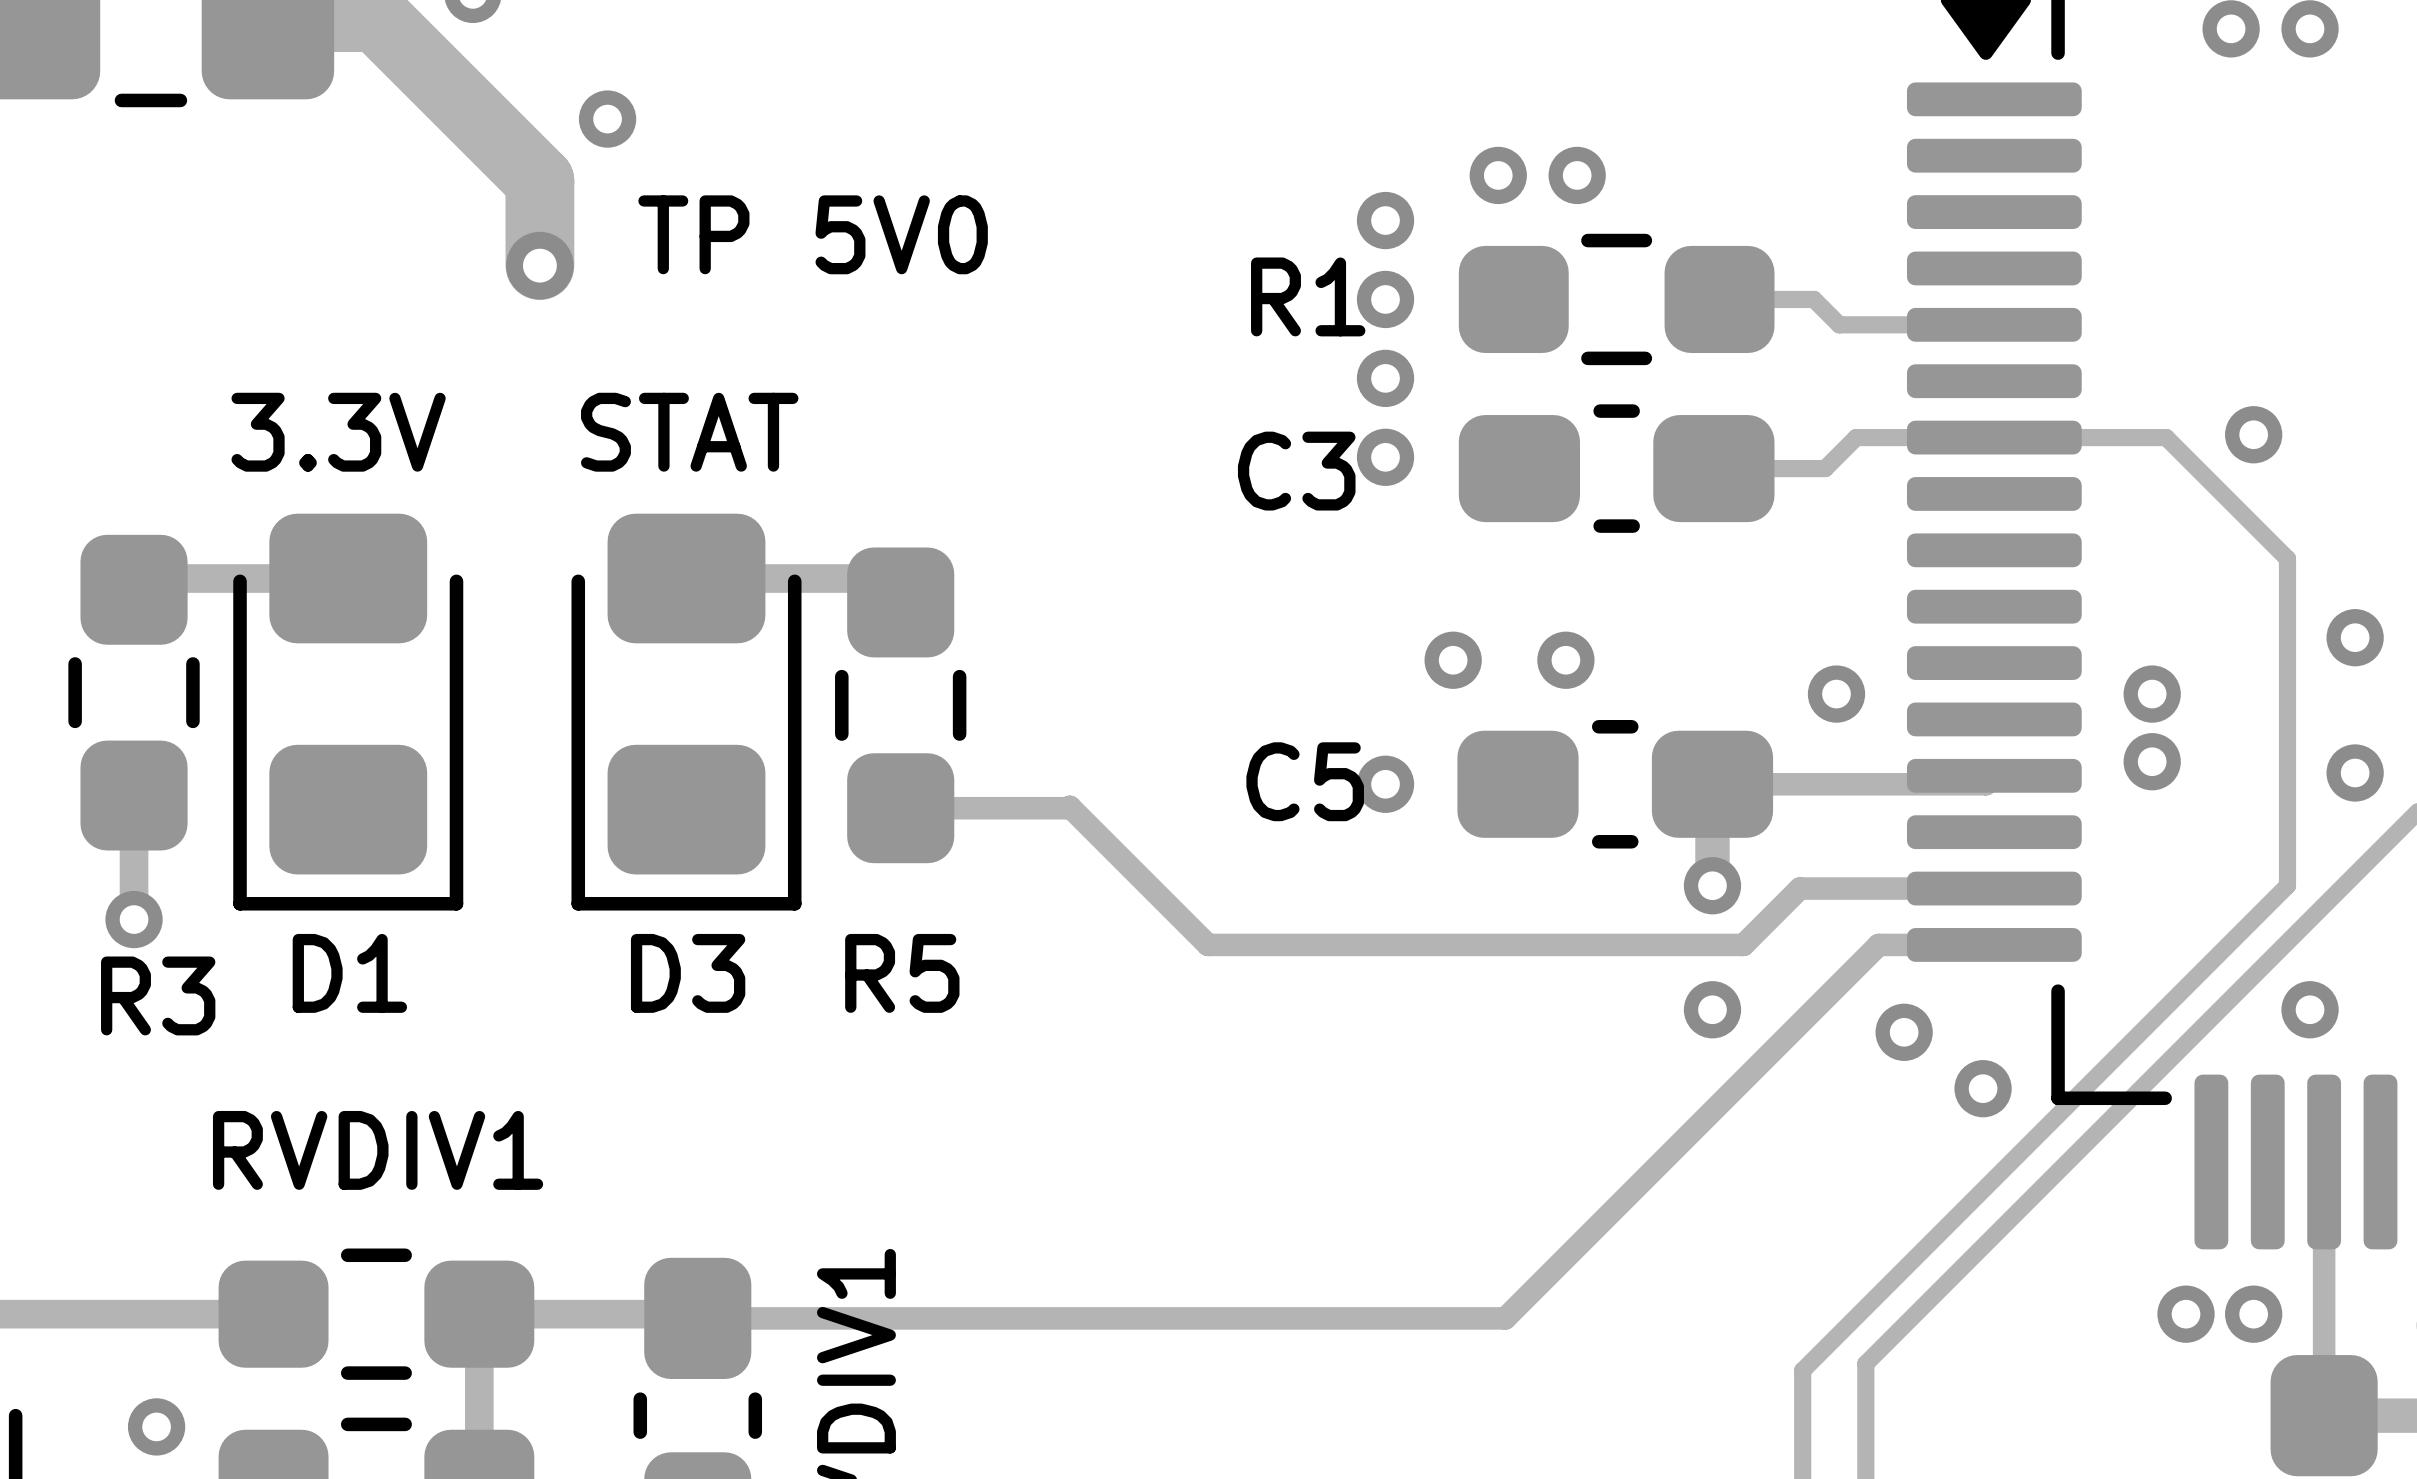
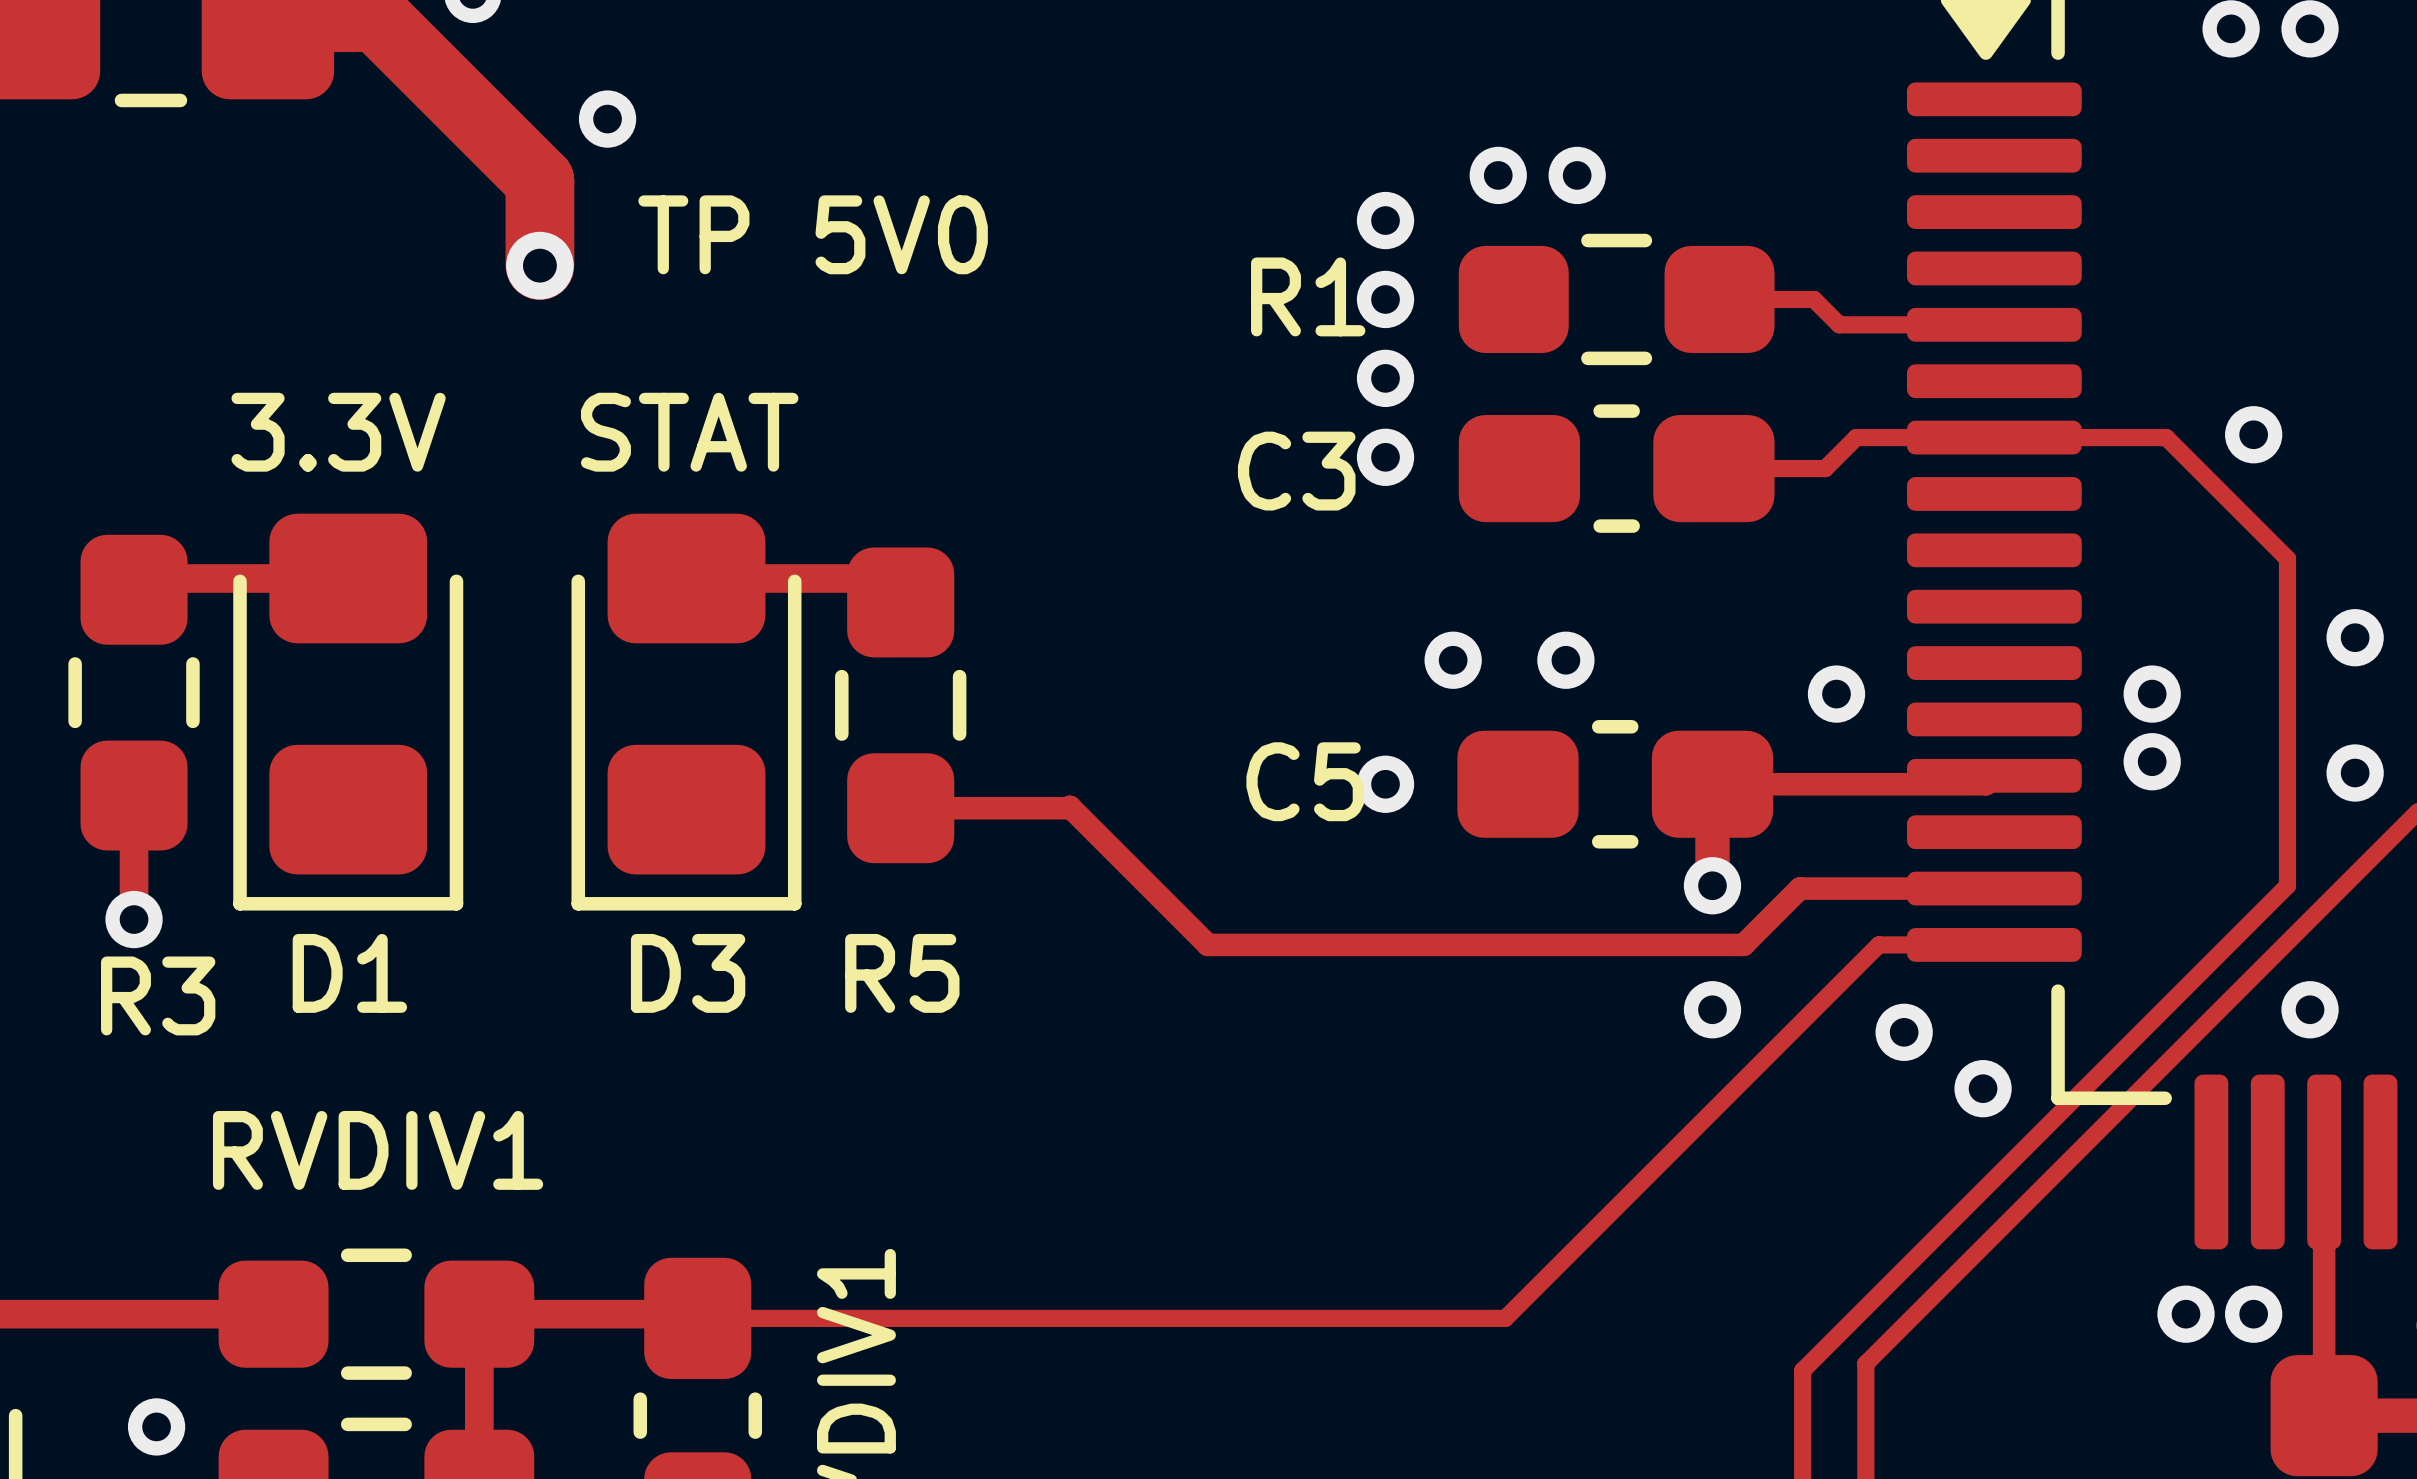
track width: thick (1994, 944) (1878, 944) (1505, 1318) (697, 1318) -> thin (1994, 944) (1878, 944) (1505, 1318) (697, 1318)

